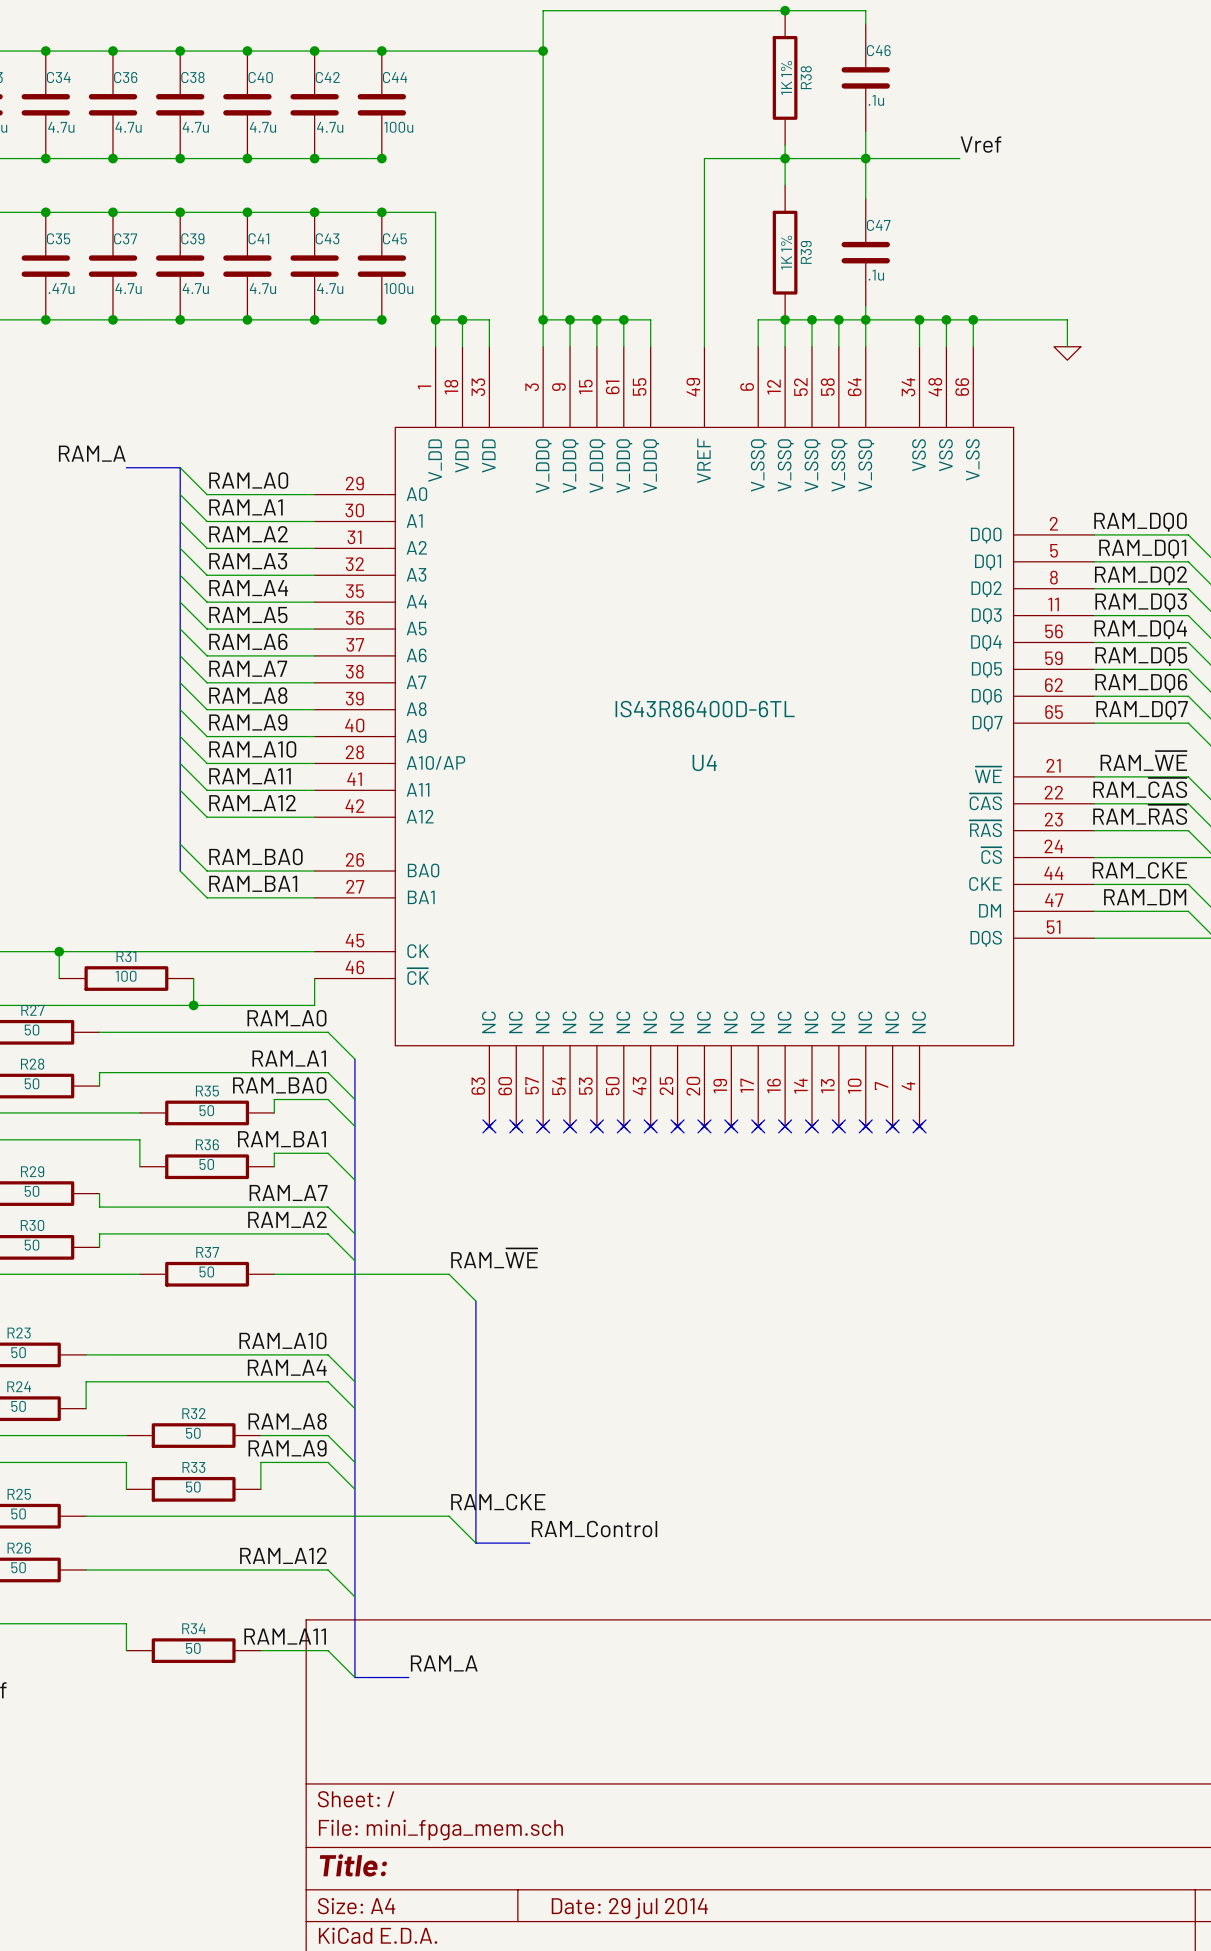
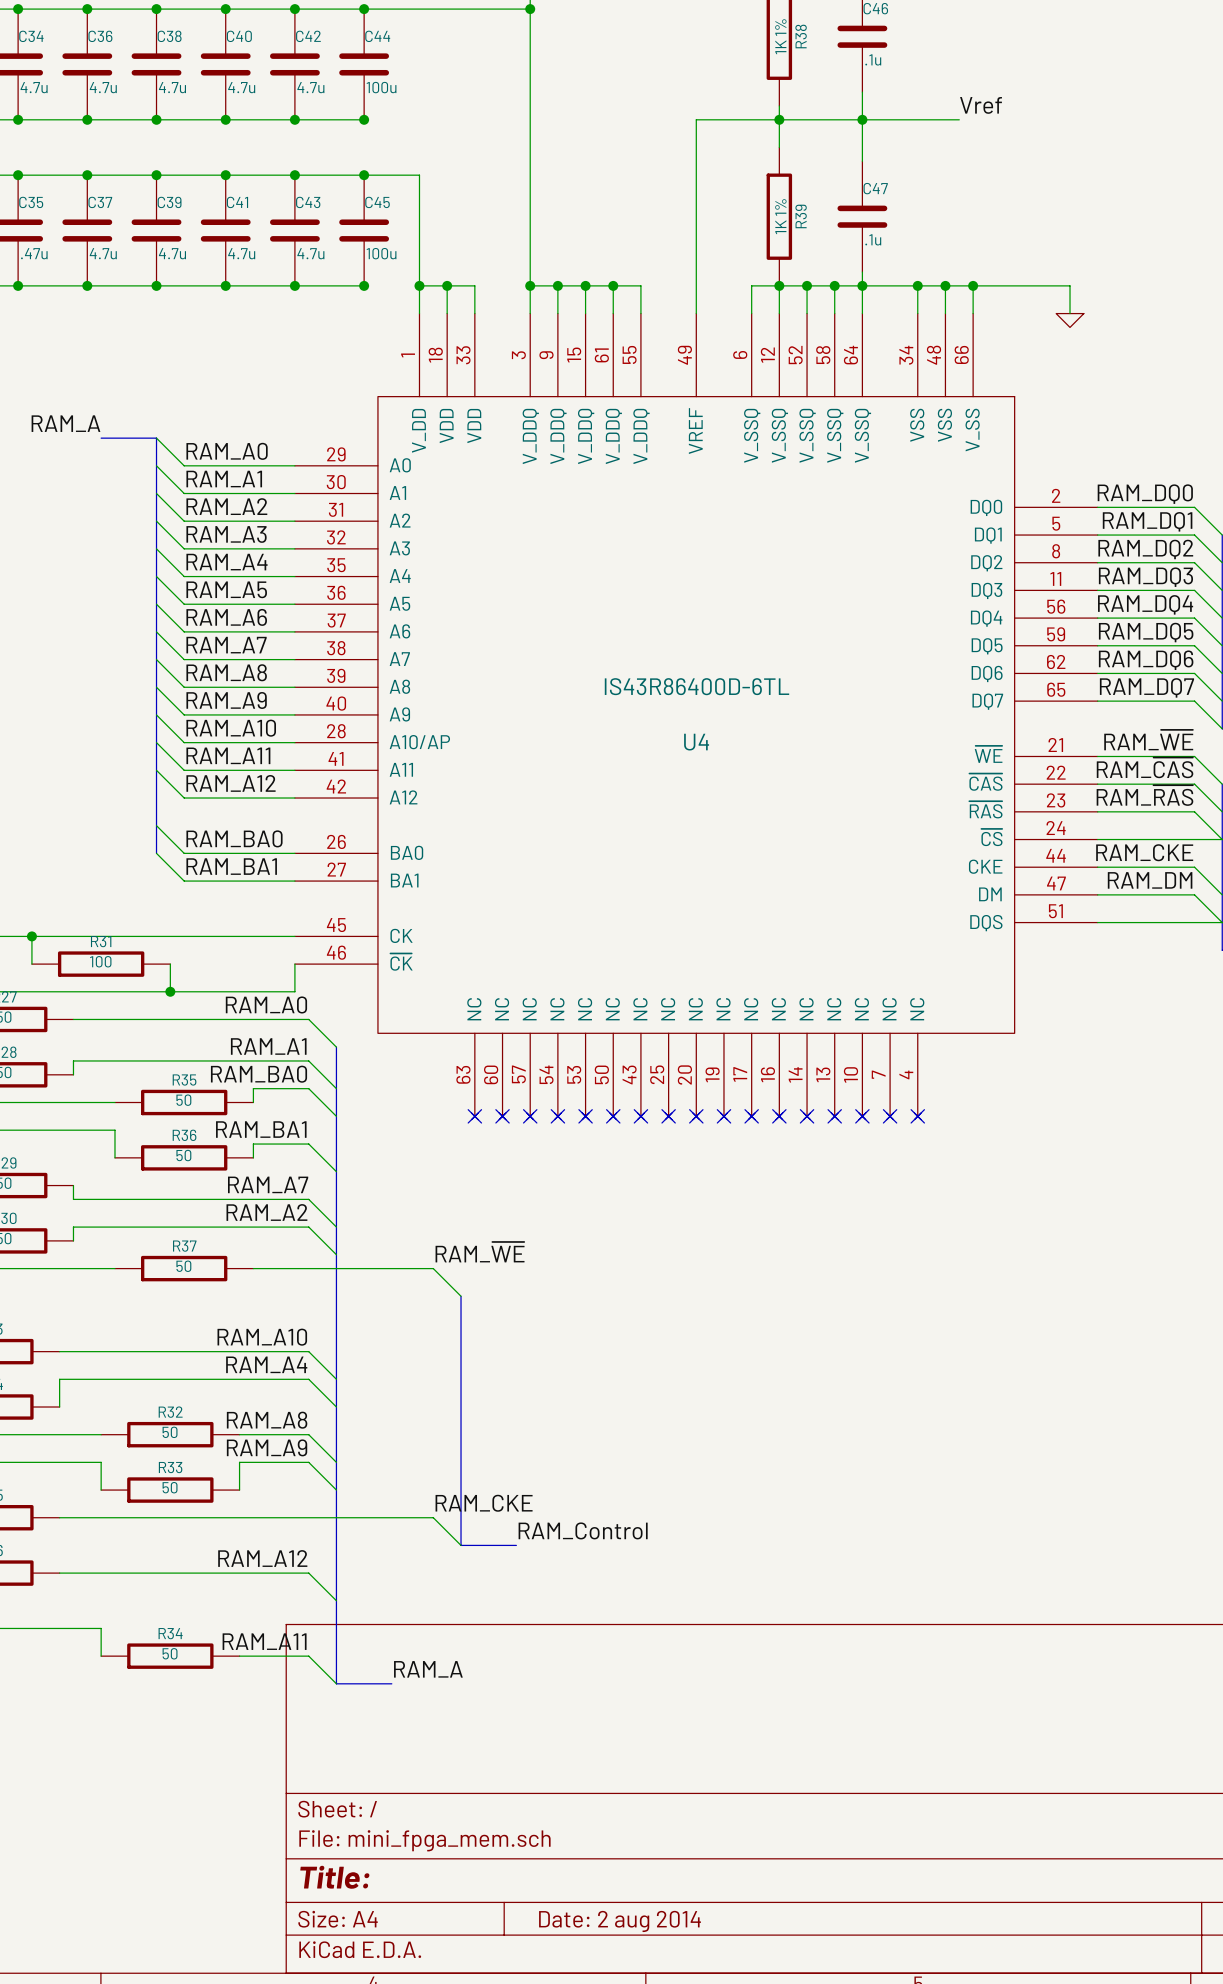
title block: Date: 29 jul 2014 (629, 1908) -> Date: 2 aug 2014 (620, 1921)

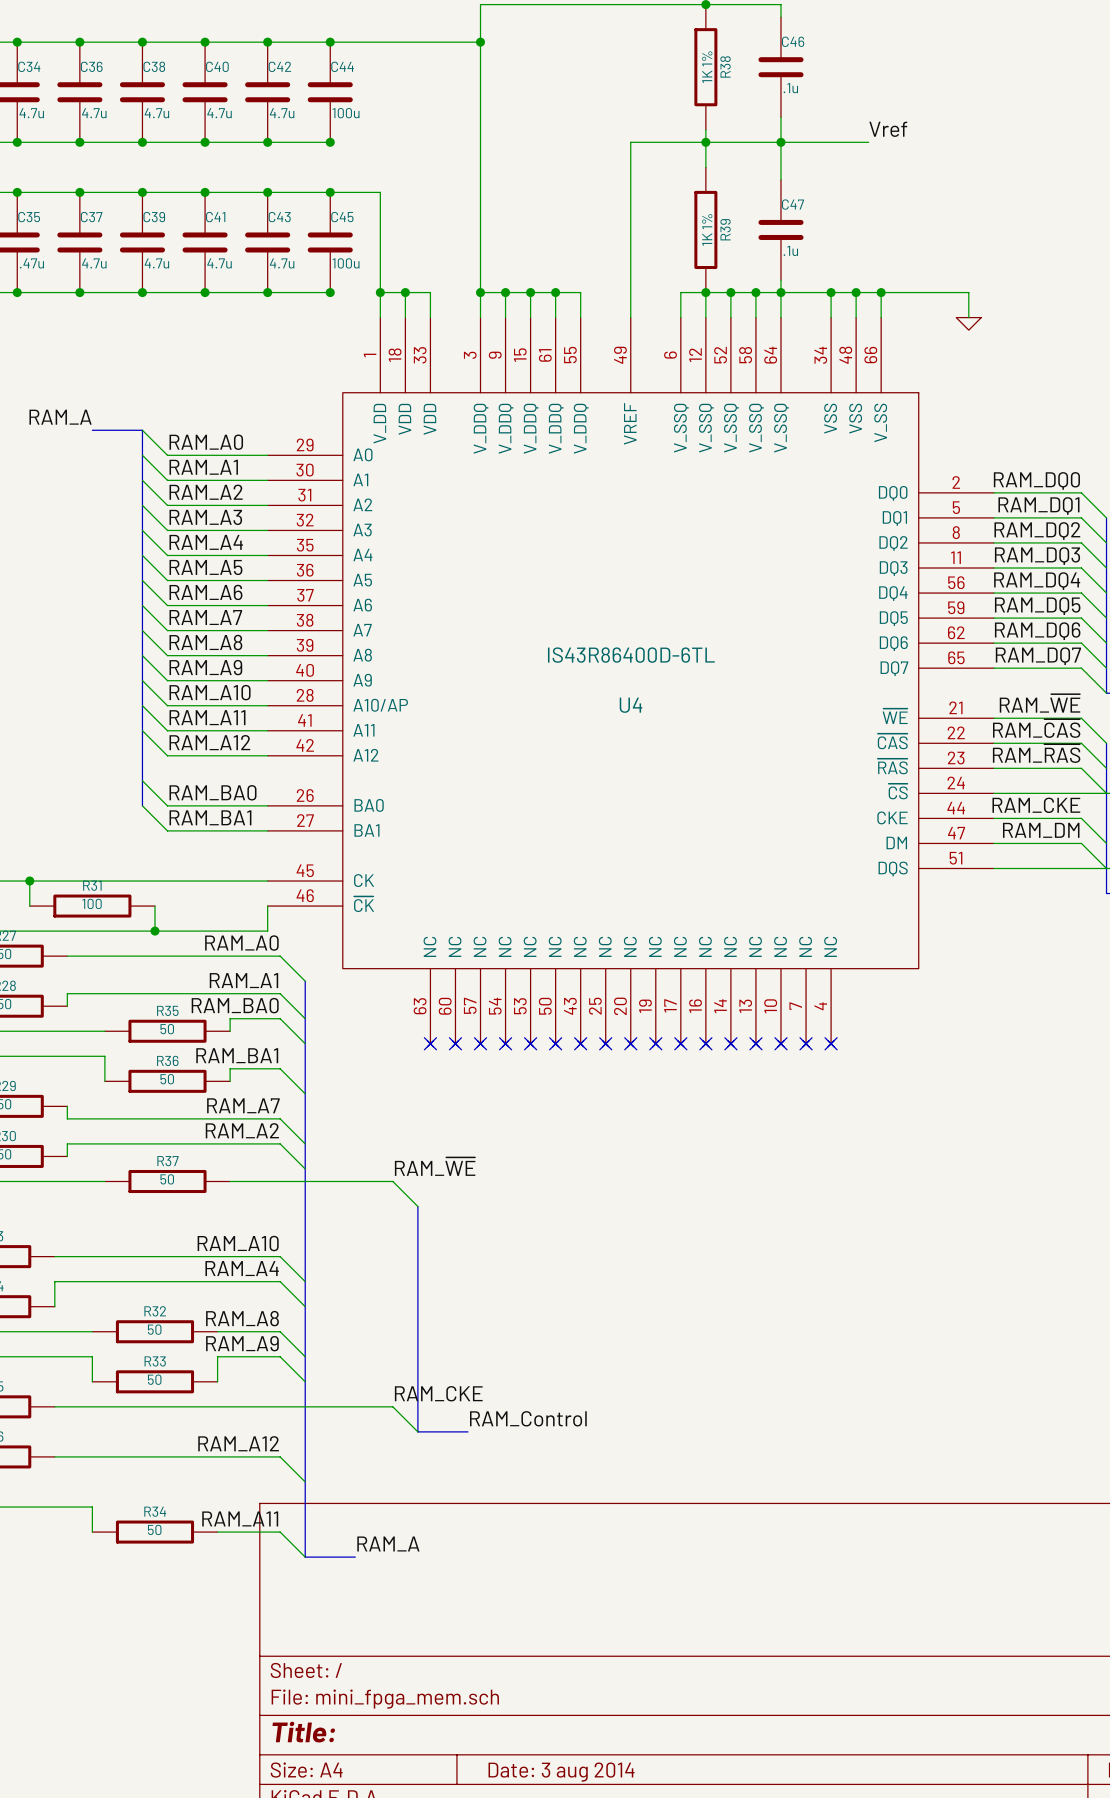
title block: Date: 2 aug 2014 (620, 1921) -> Date: 3 aug 2014 (561, 1772)

